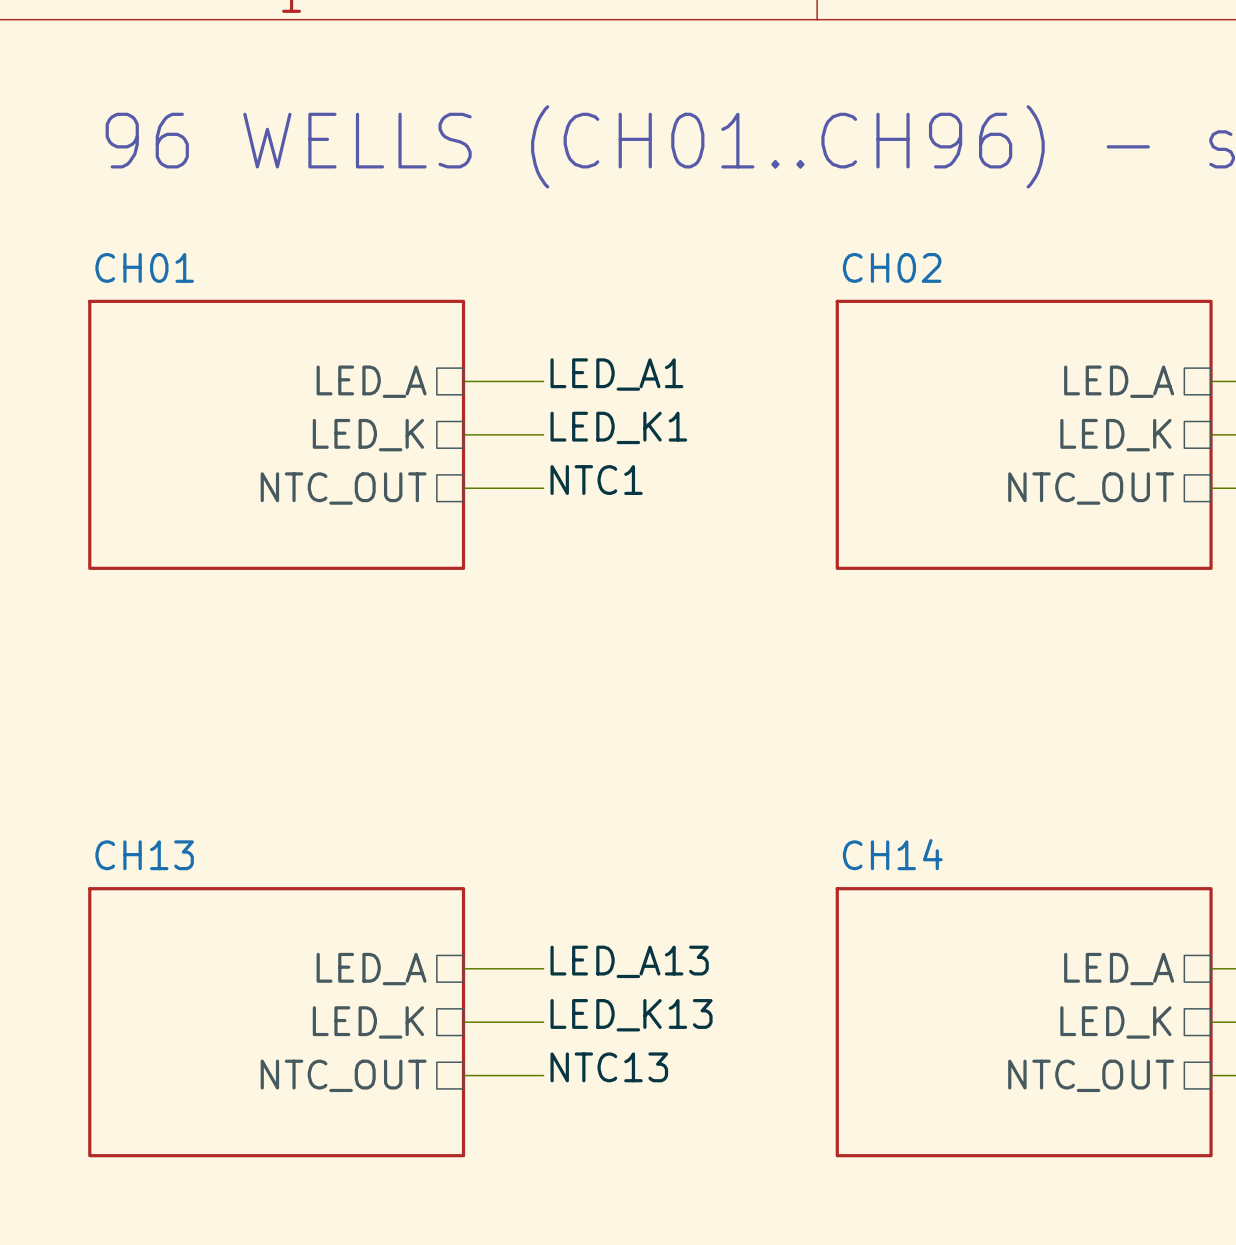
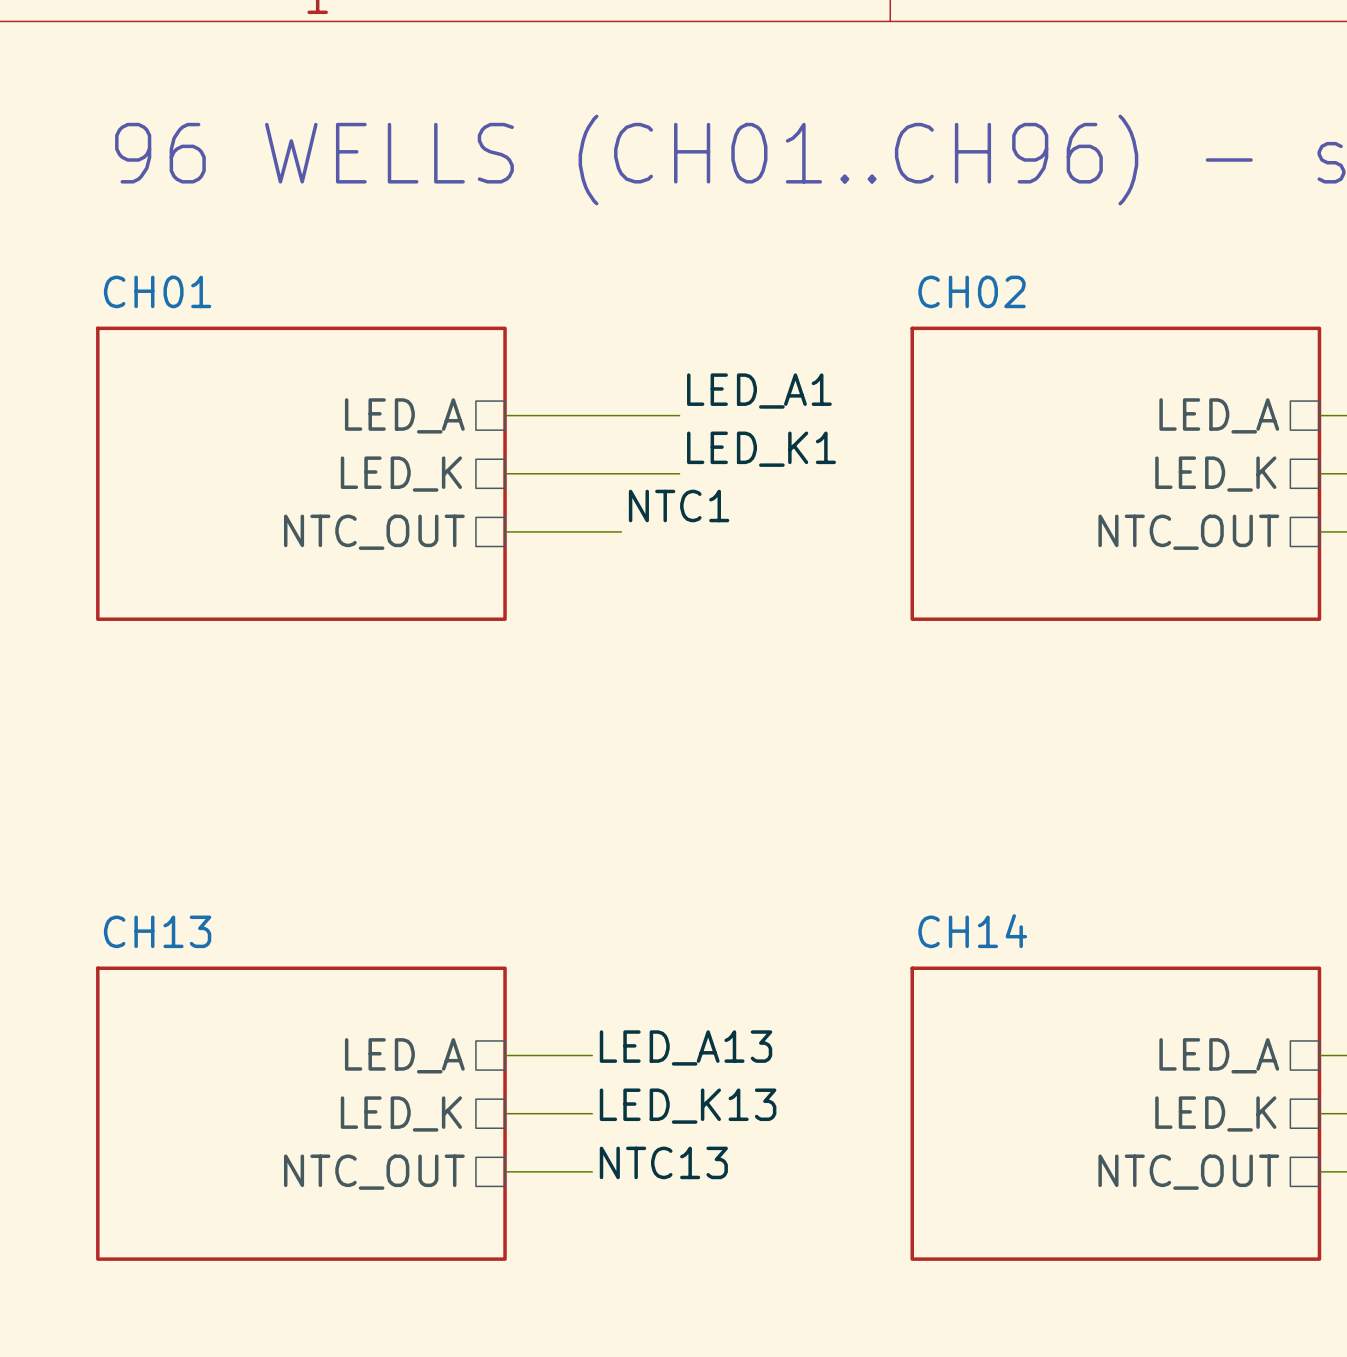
label position: LED_A1 (616, 374) -> LED_A1 (759, 391)
wire: none -> (592, 415) (679, 415)
label position: LED_K1 (618, 427) -> LED_K1 (761, 449)
wire: none -> (592, 473) (679, 473)
label position: NTC1 (596, 480) -> NTC1 (679, 505)
wire: none -> (592, 531) (621, 531)

